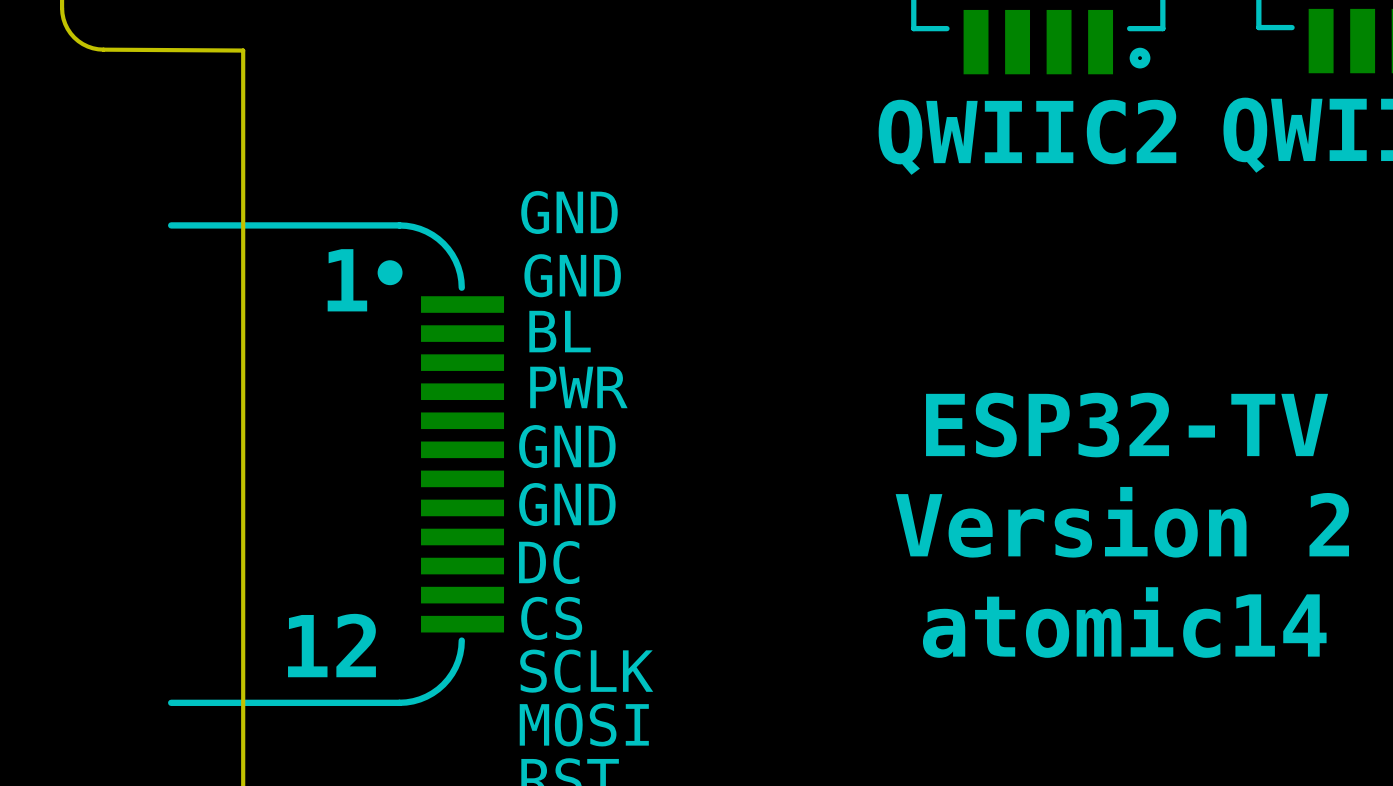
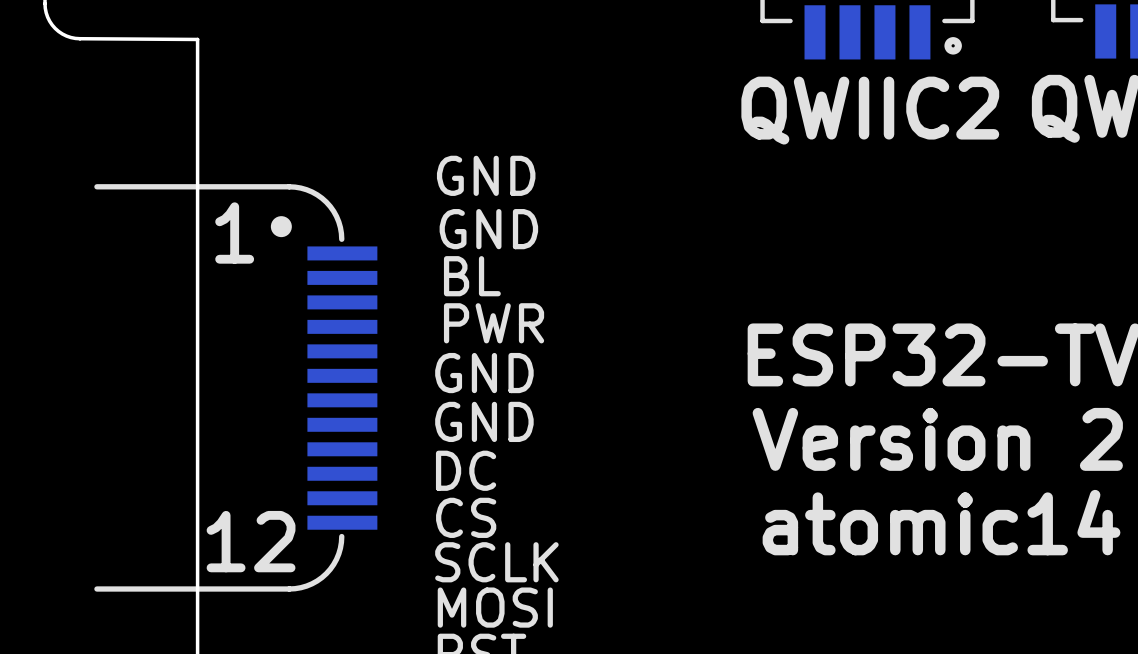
part: none -> (235, 387)
part: (336, 464) -> none

